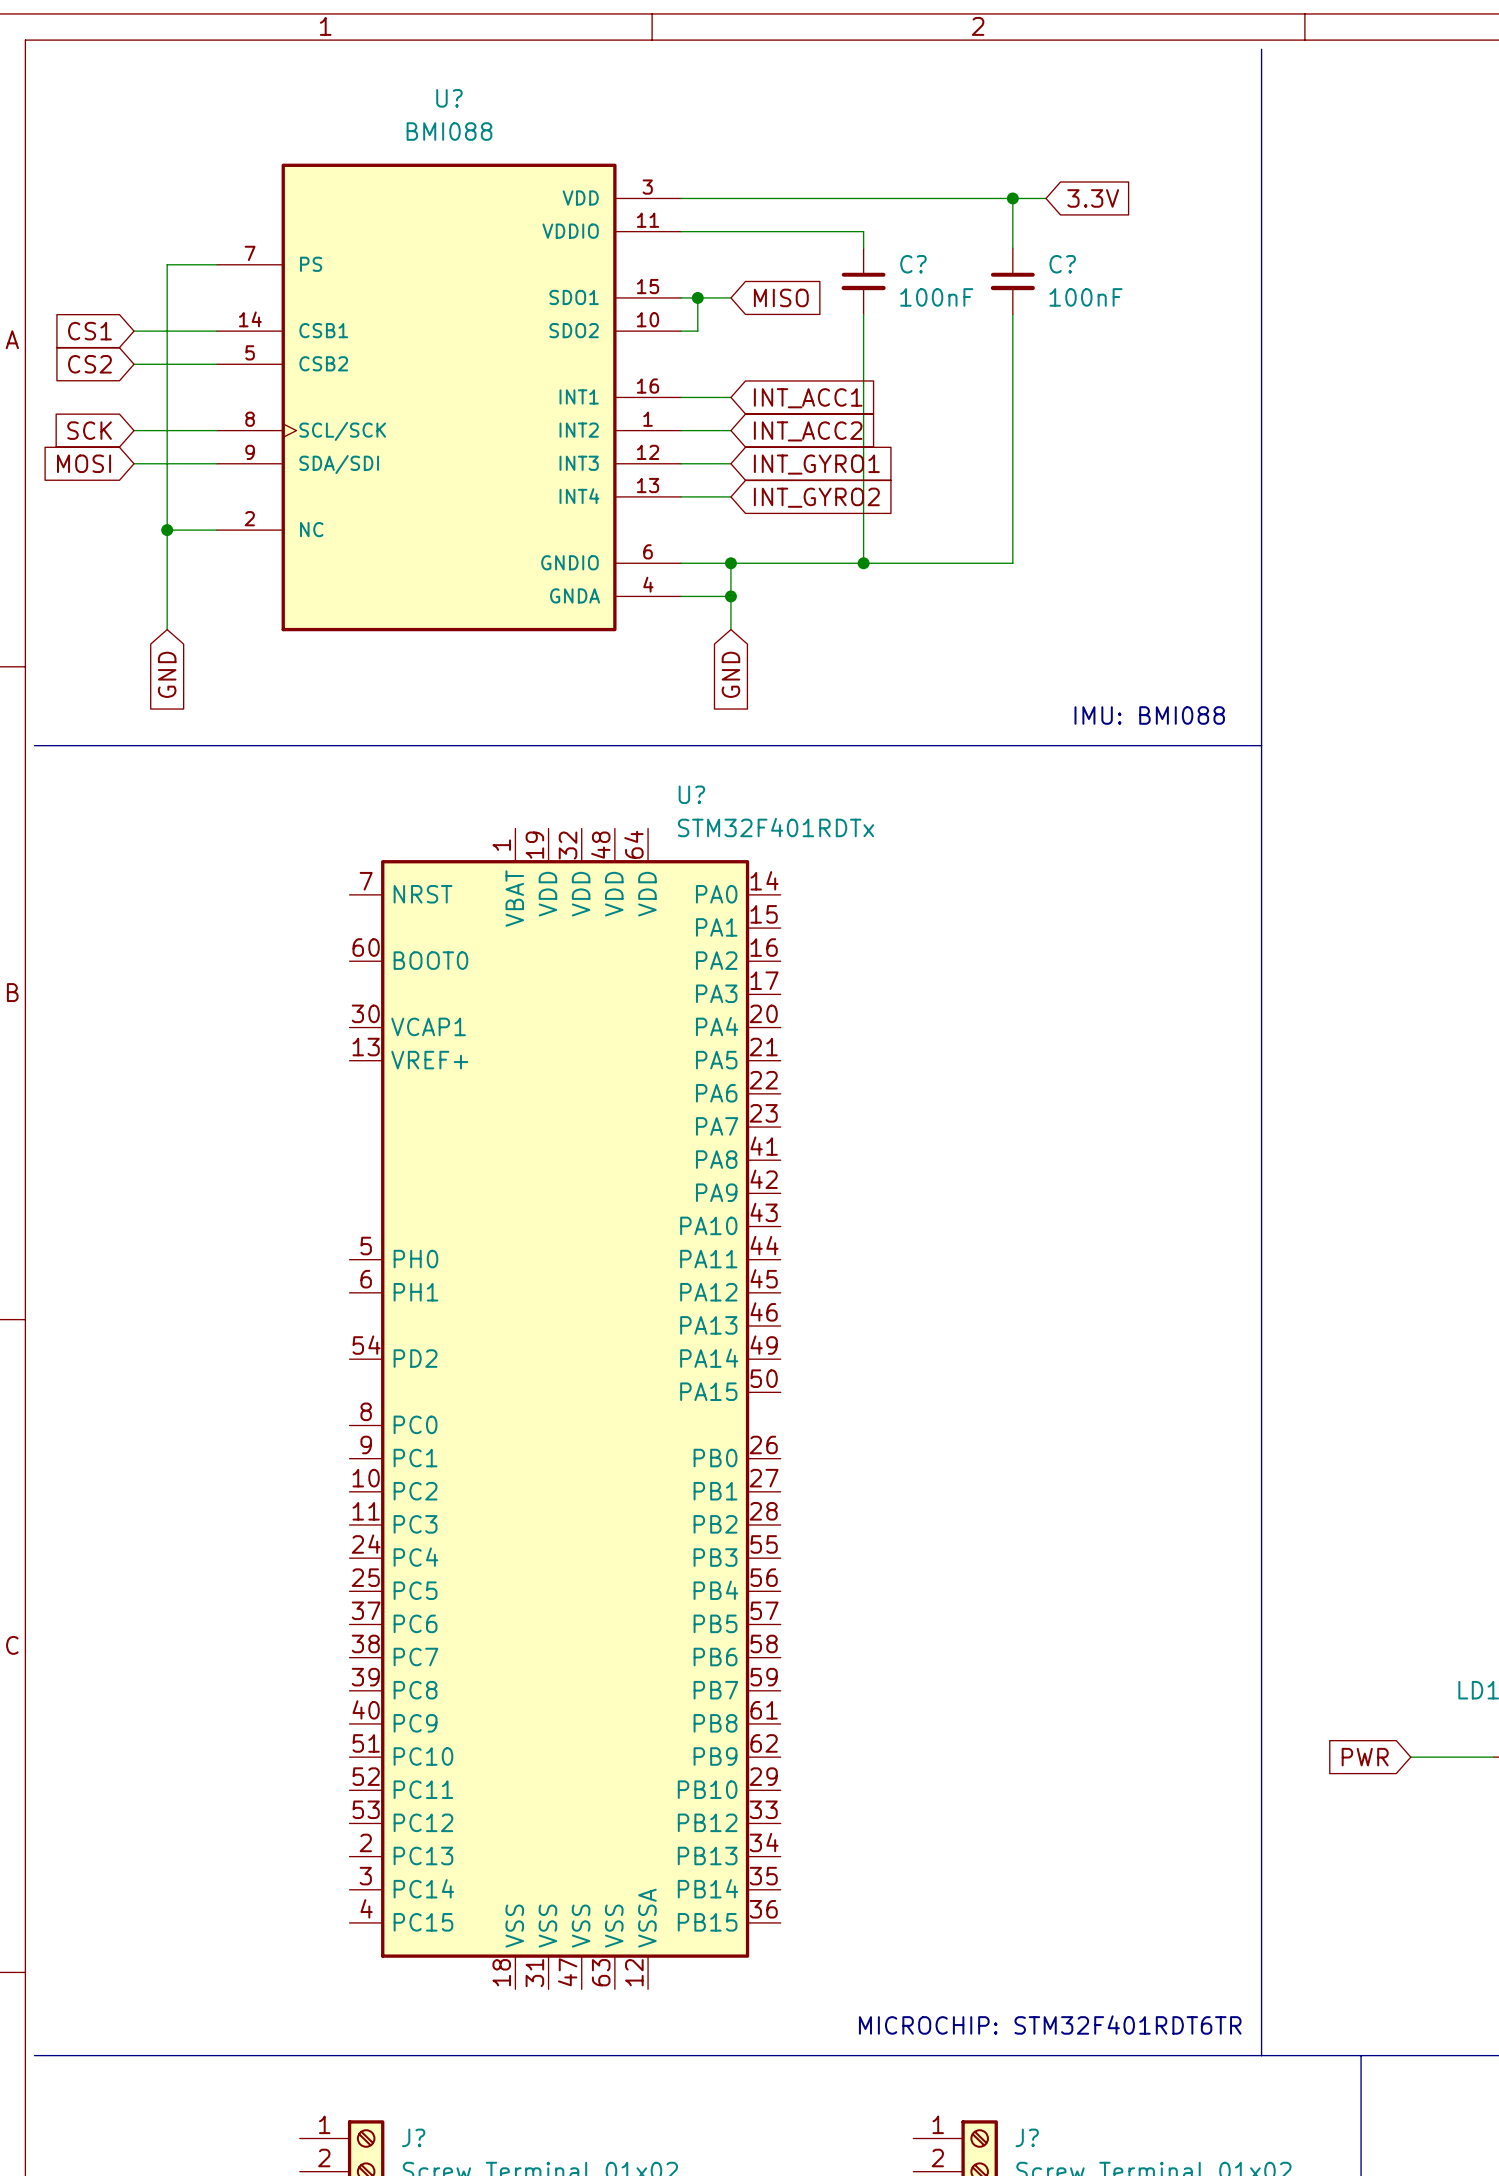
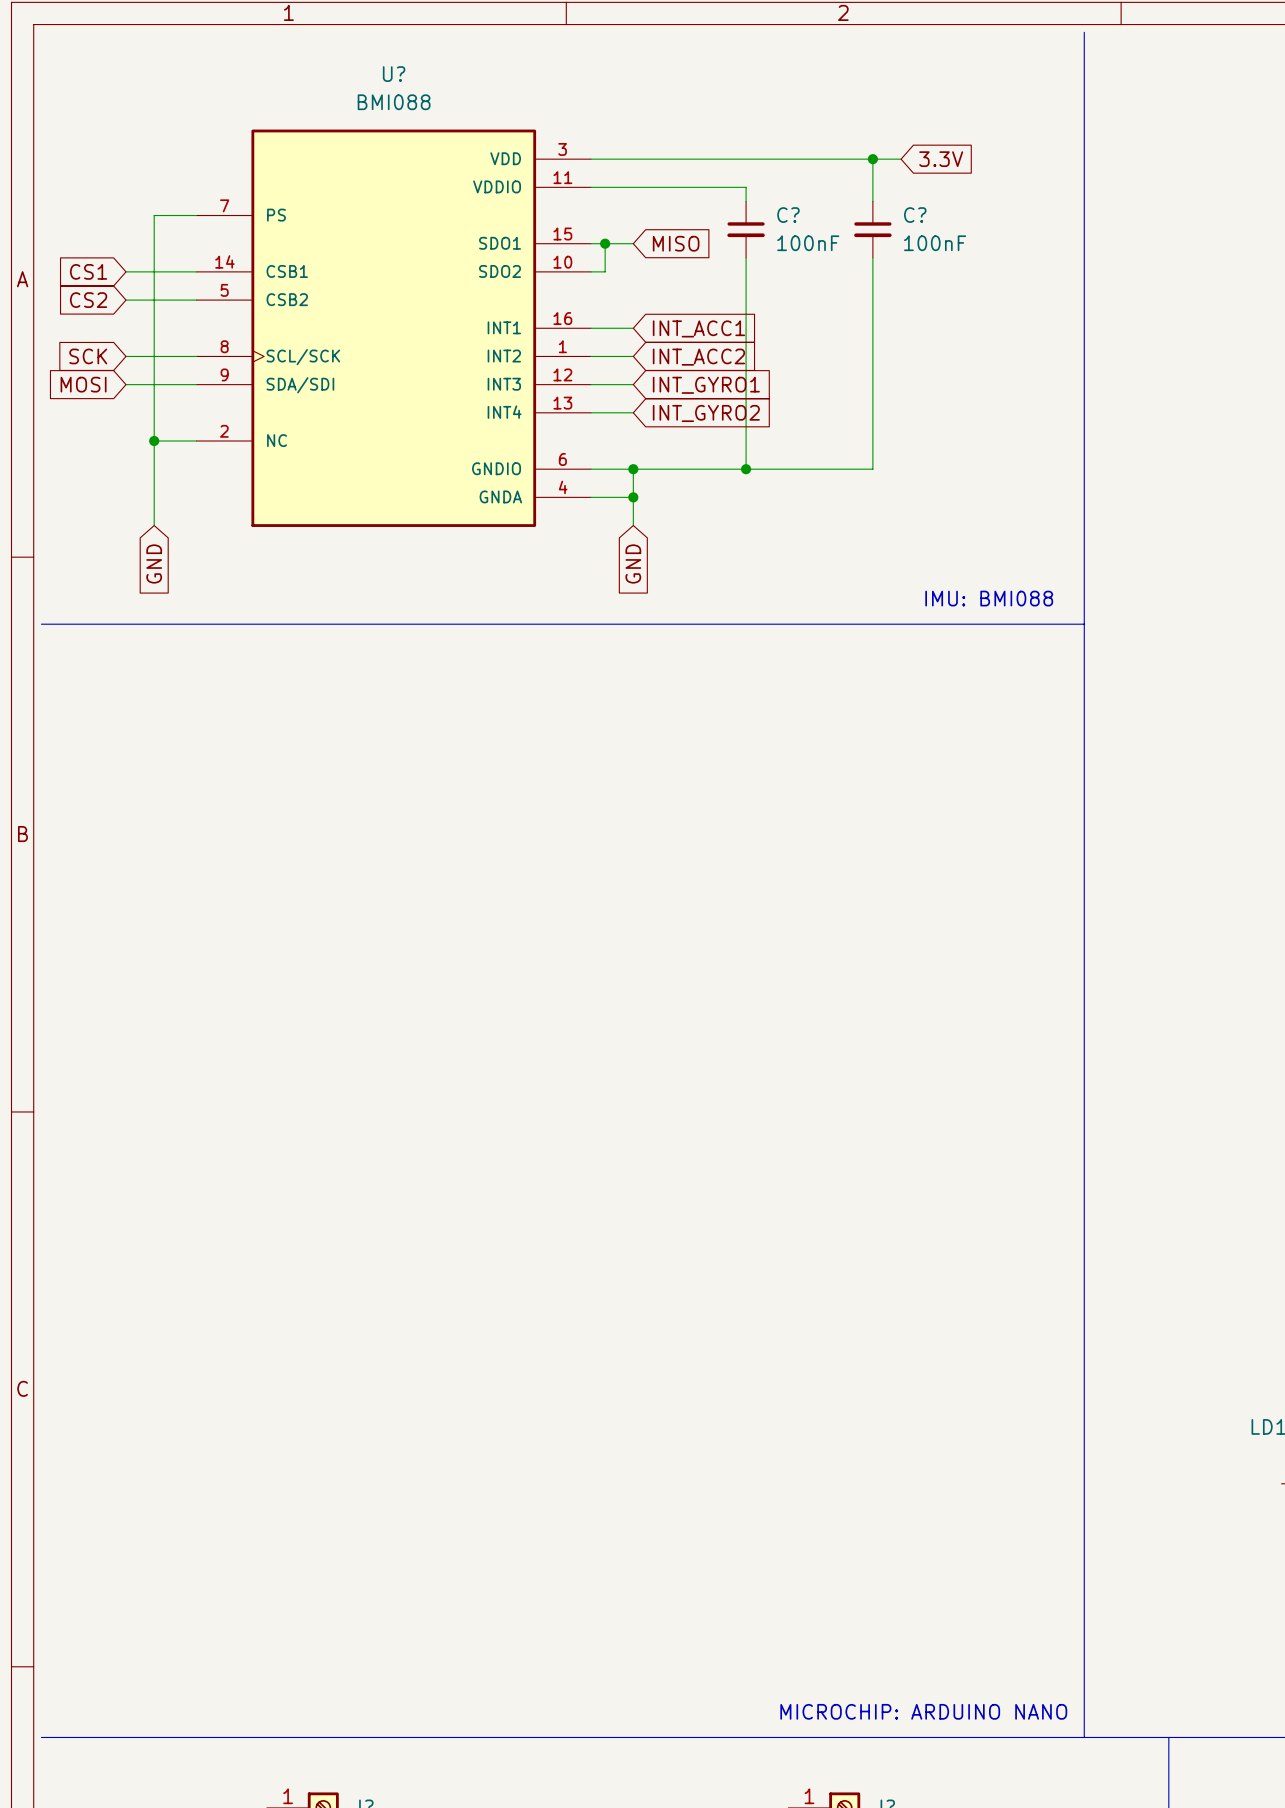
U?: STM32F401RDTx (565, 1408) -> none
global label: PWR (1365, 1757) -> none
wire: (1410, 1757) (1493, 1757) -> none
text: MICROCHIP: STM32F401RDT6TR (1050, 2025) -> MICROCHIP: ARDUINO NANO (923, 1711)

